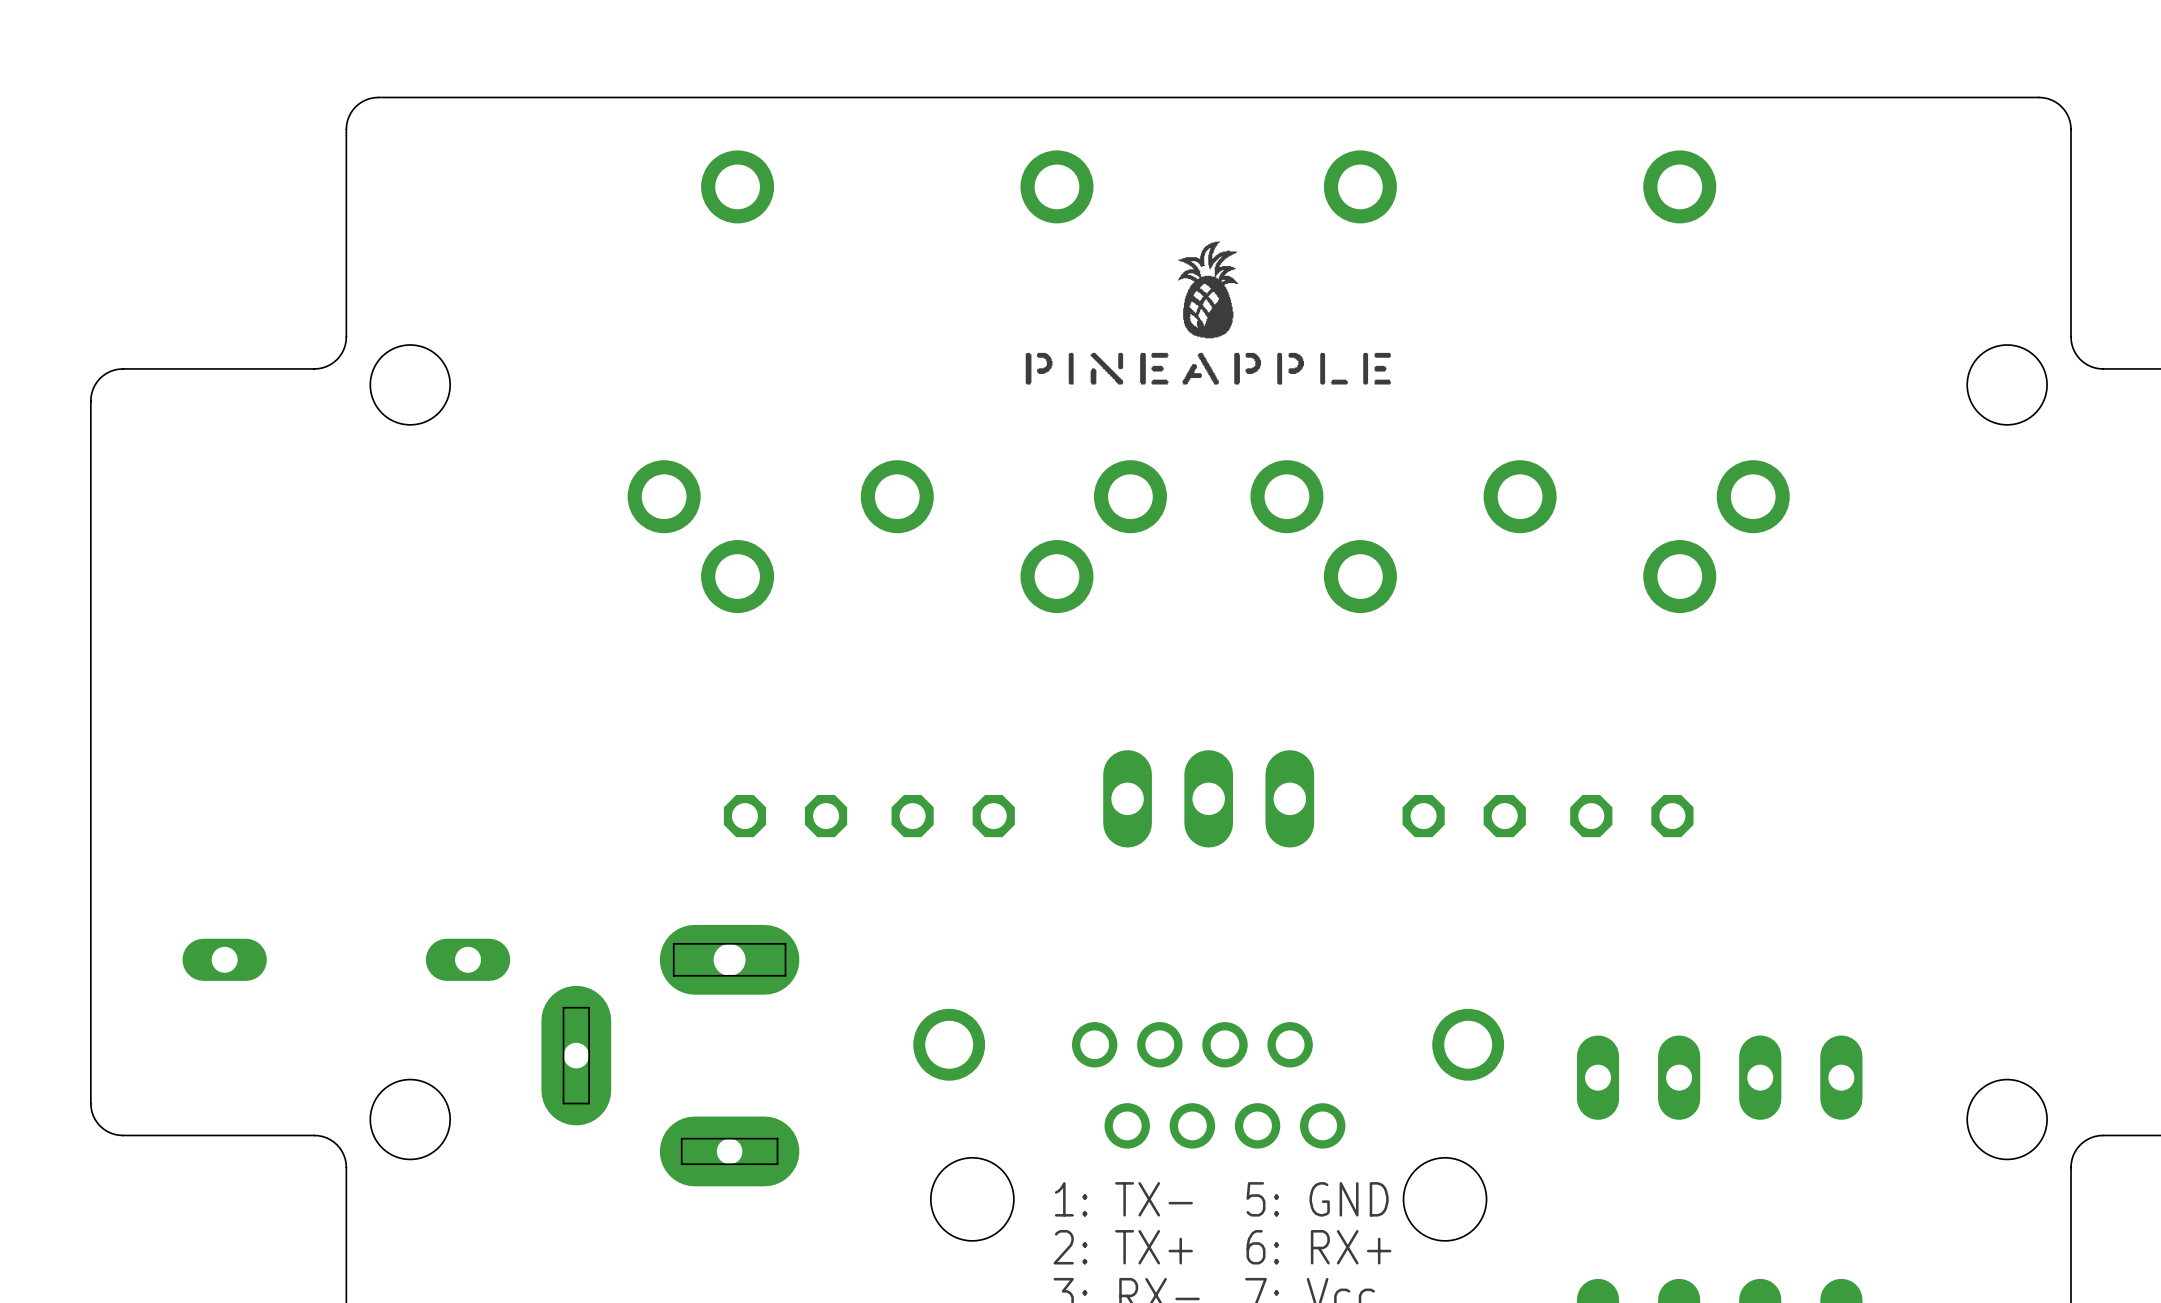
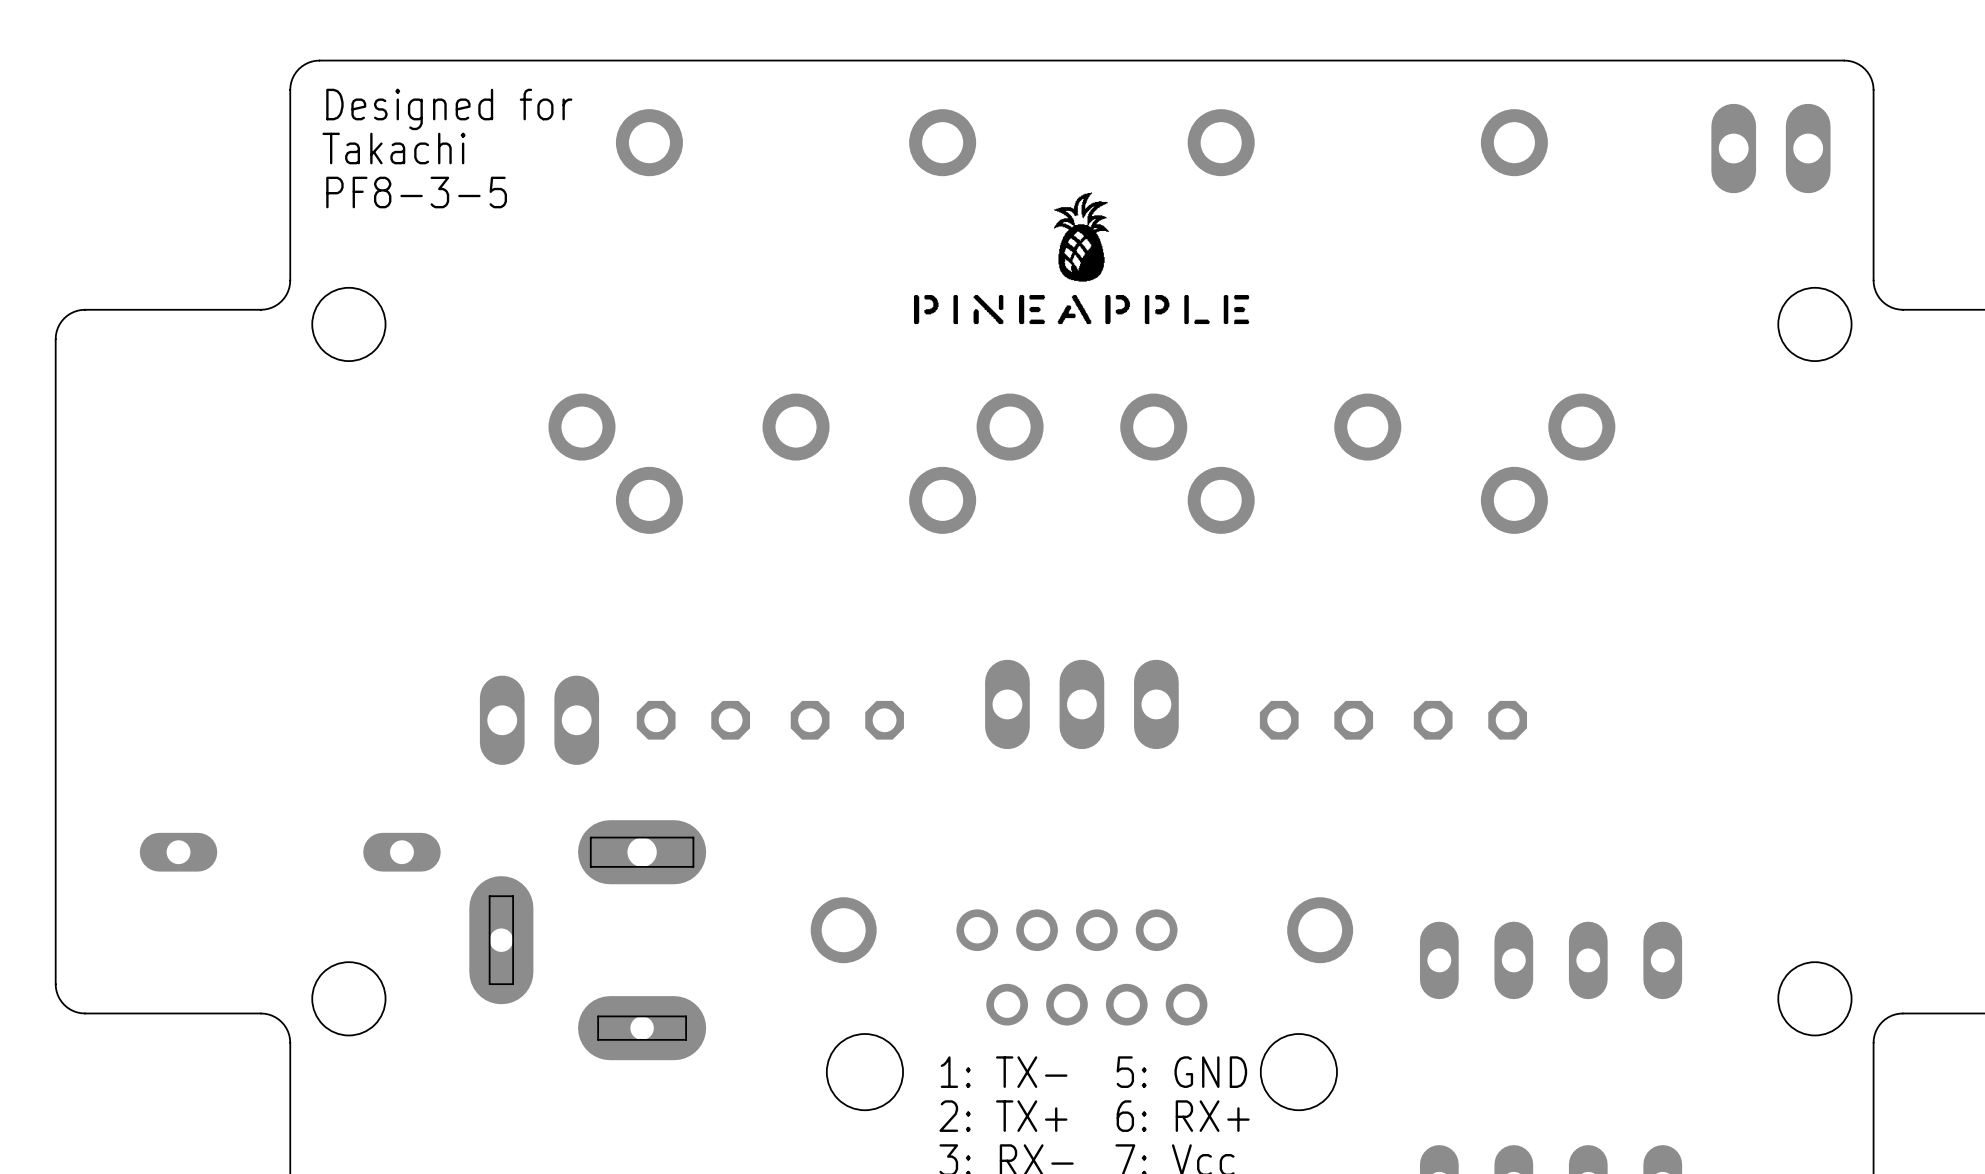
text: none -> Designed for (449, 109)
text: none -> Takachi (394, 148)
part: none -> (1770, 148)
text: none -> PF8-3-5 (416, 192)
part: none -> (539, 720)

